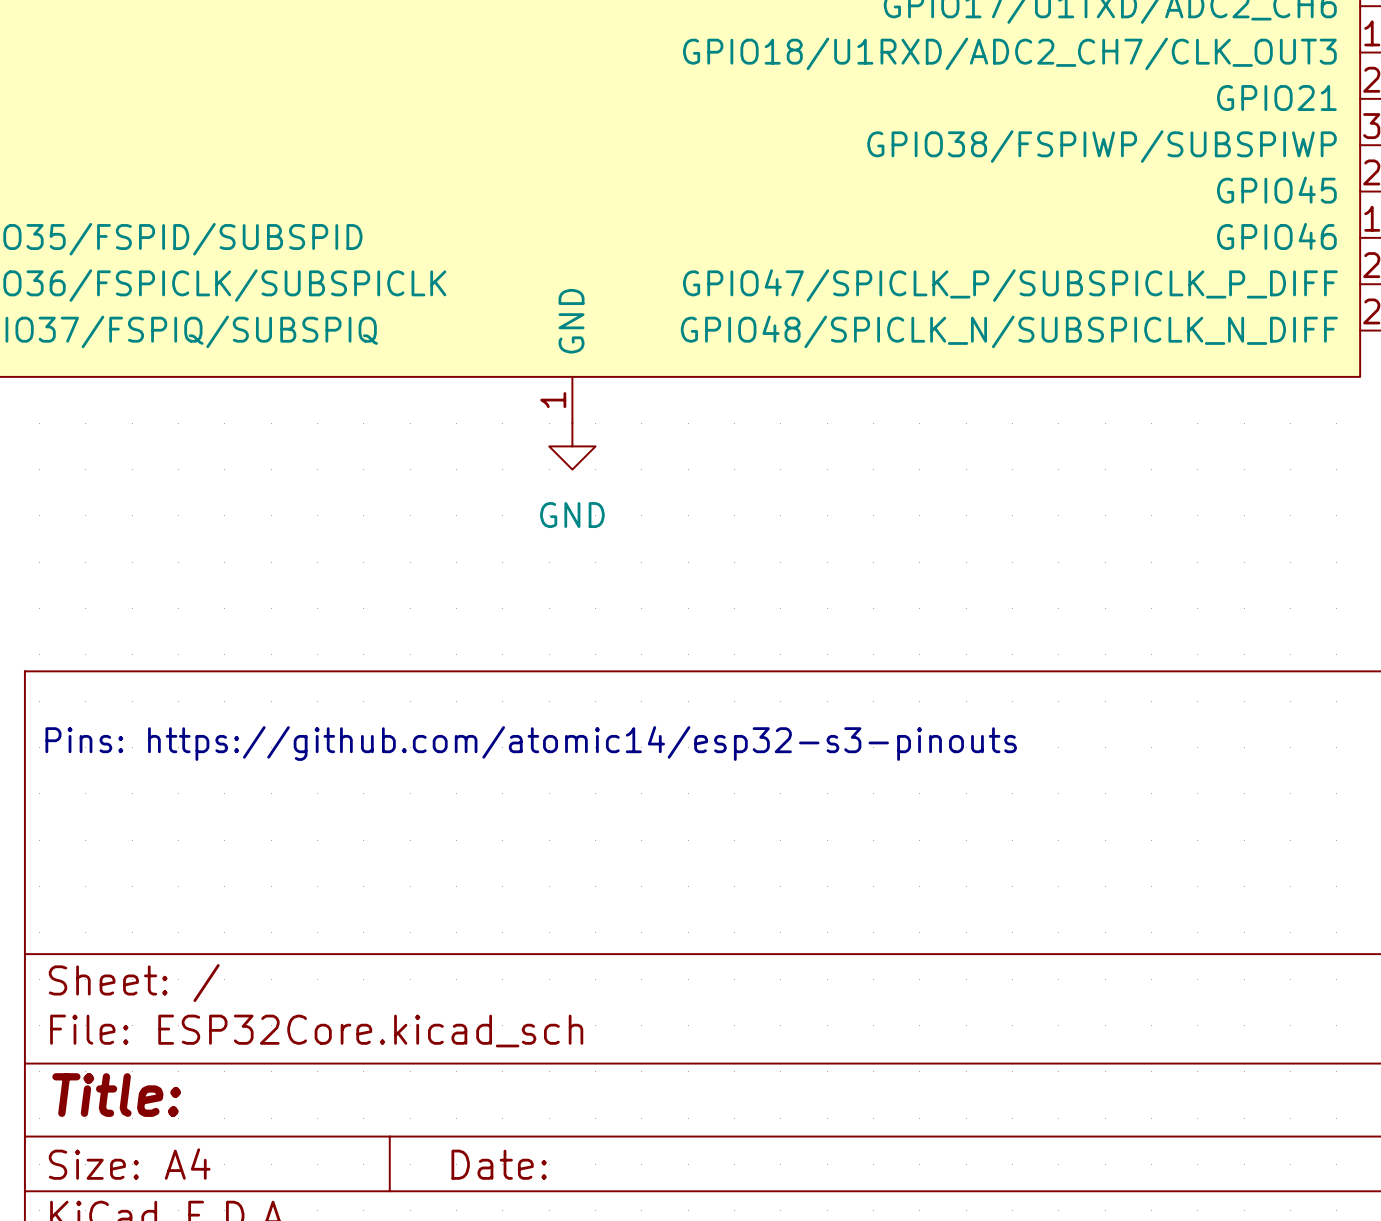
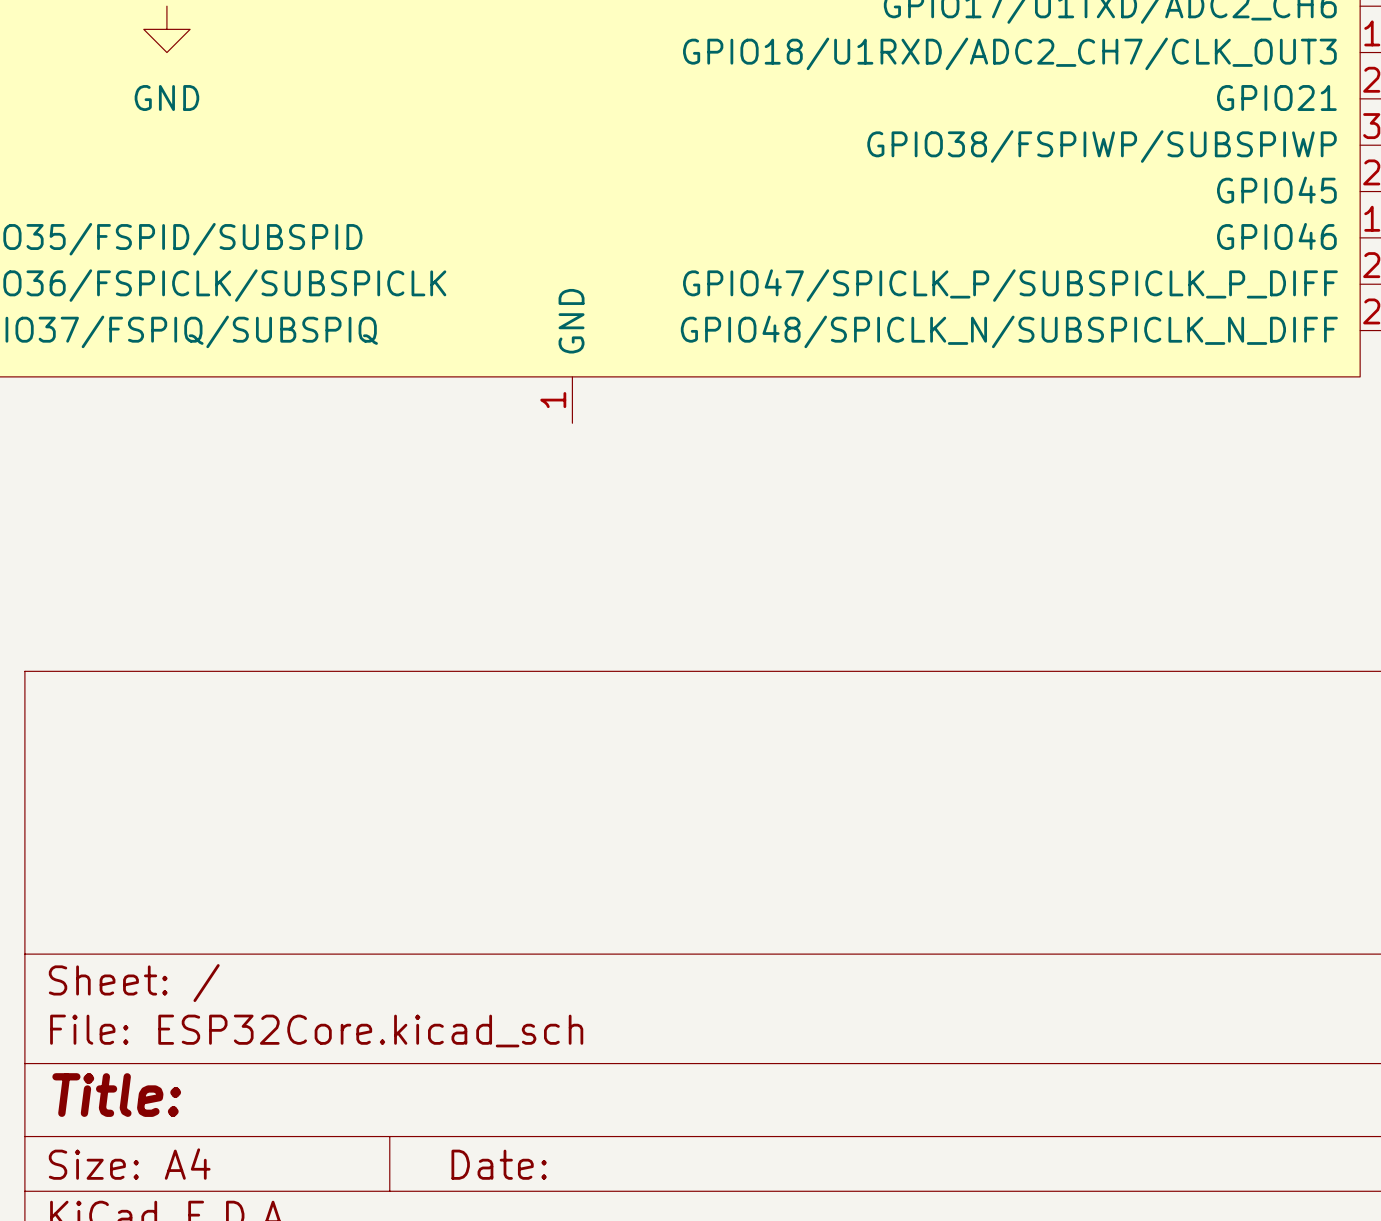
power symbol: none -> GND (166, 29)
power symbol: GND (572, 446) -> none
text: Pins: https://github.com/atomic14/esp32-s3-pinouts (531, 743) -> none

